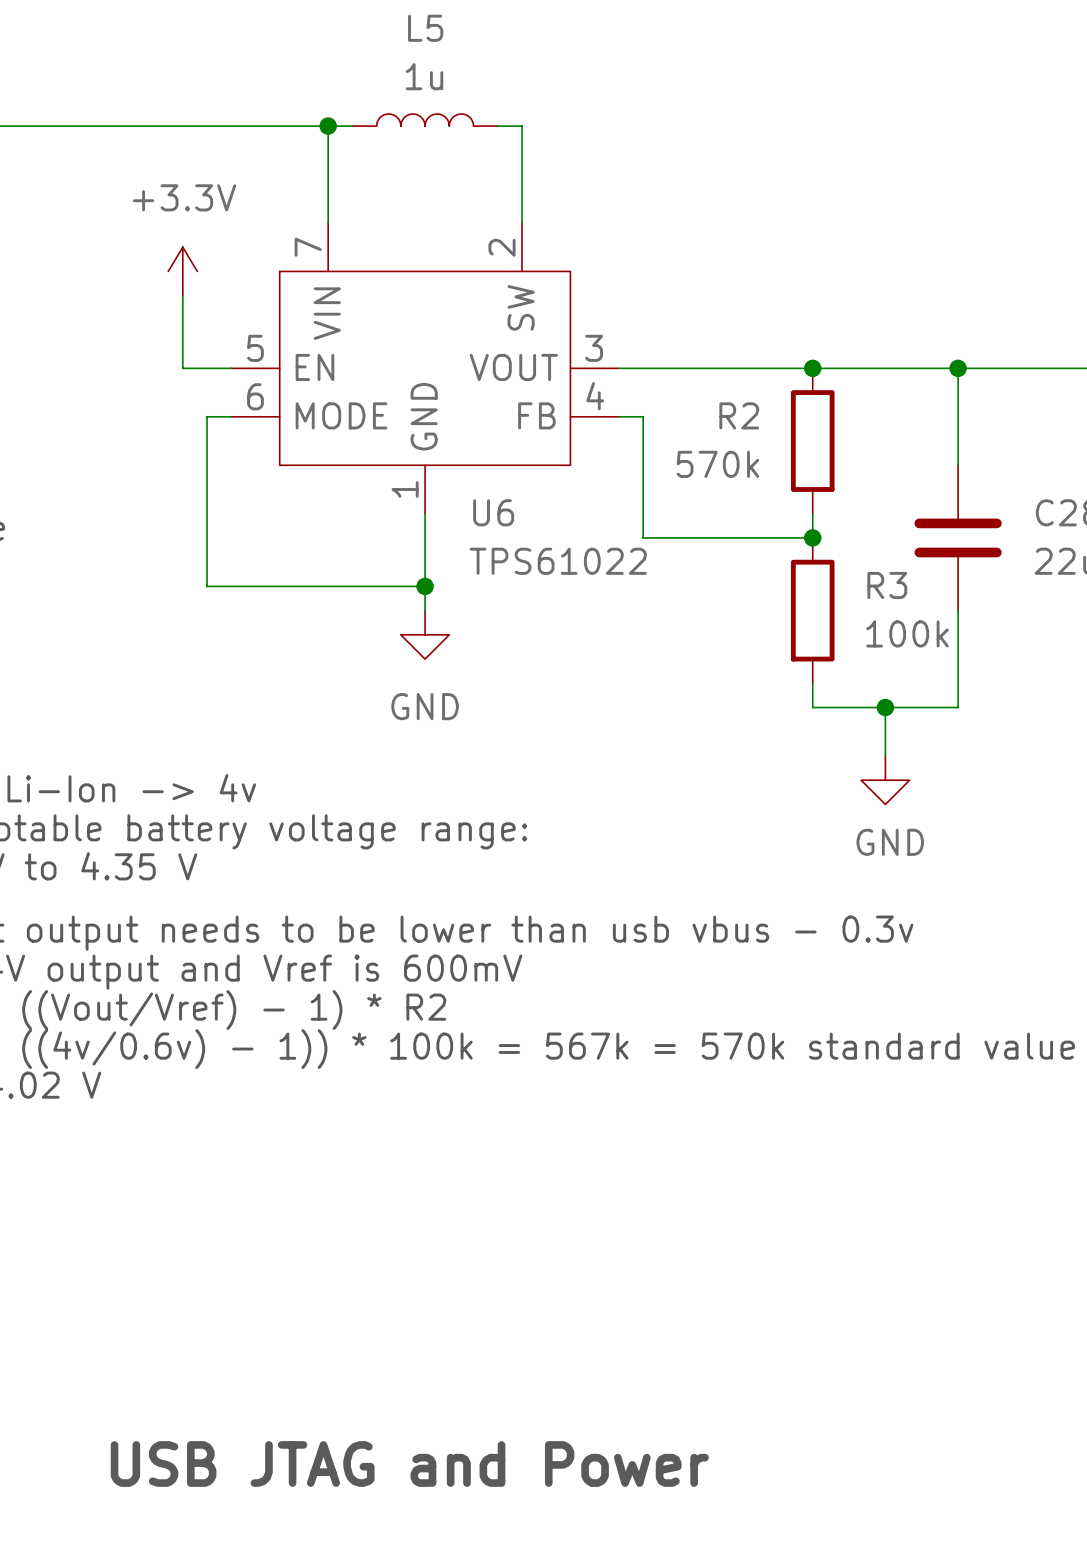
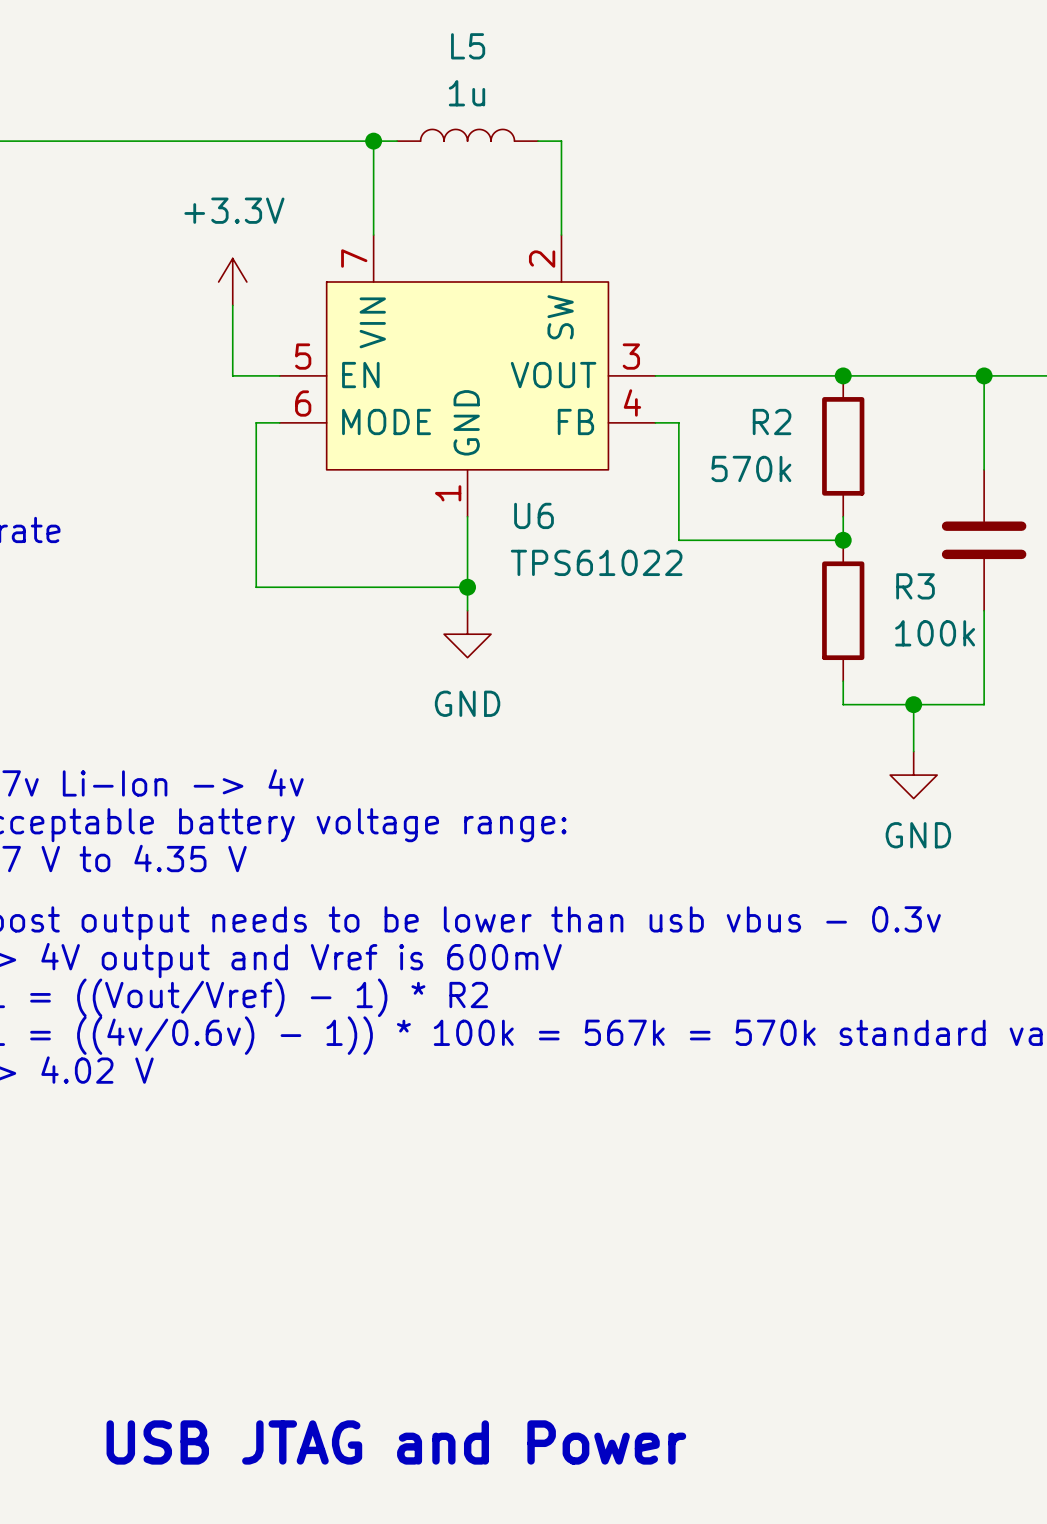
text position: USB JTAG and Power (409, 1464) -> USB JTAG and Power (396, 1442)

